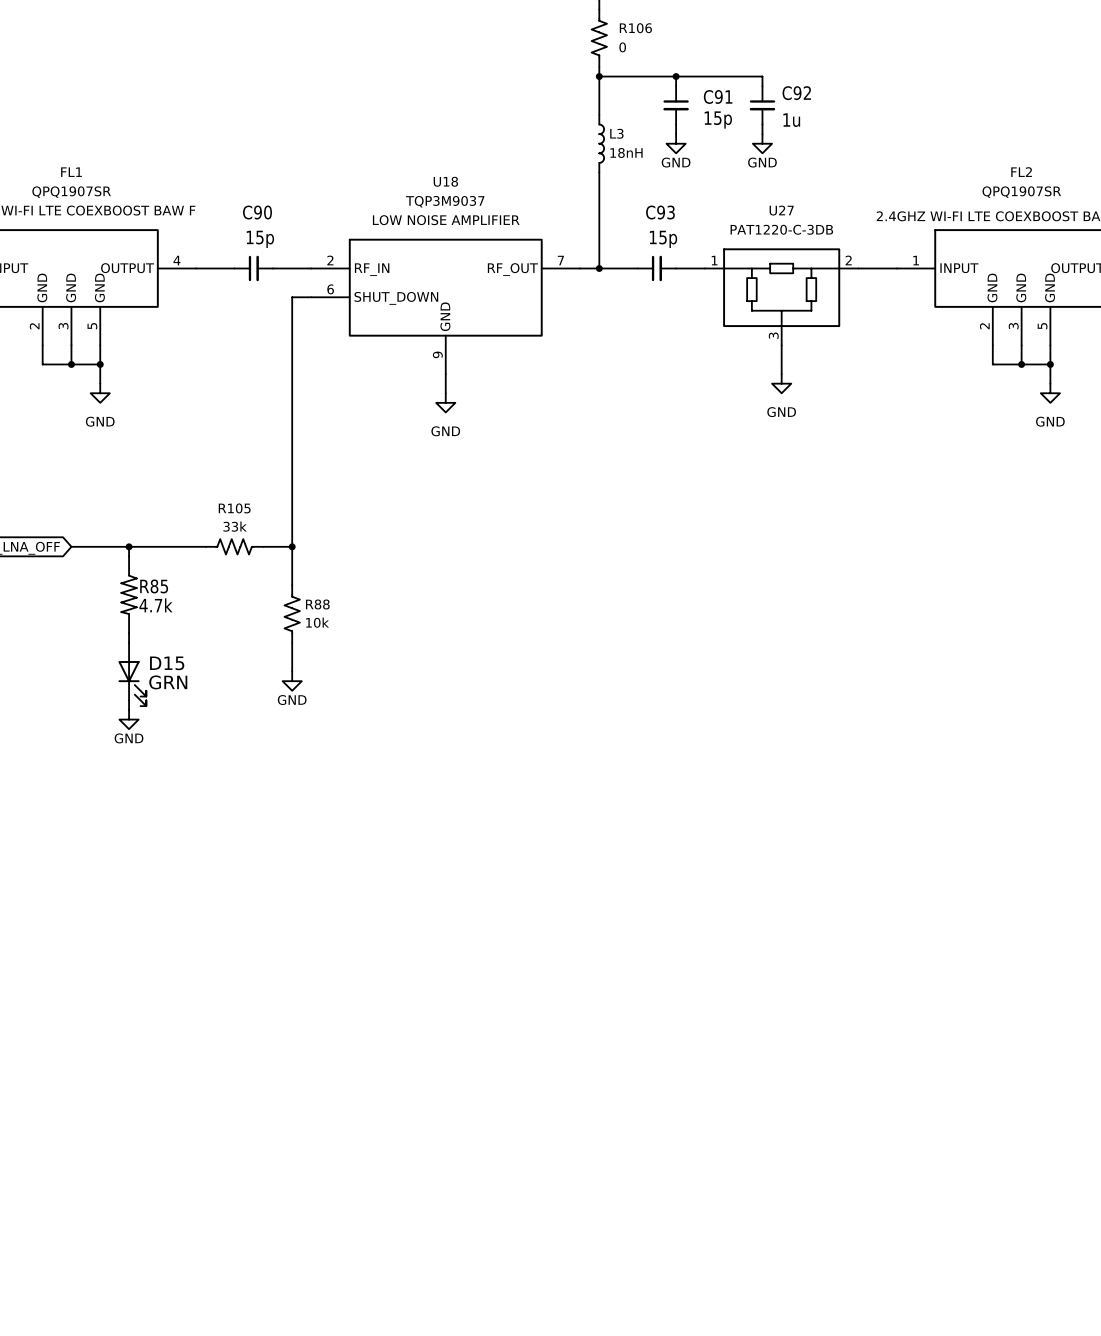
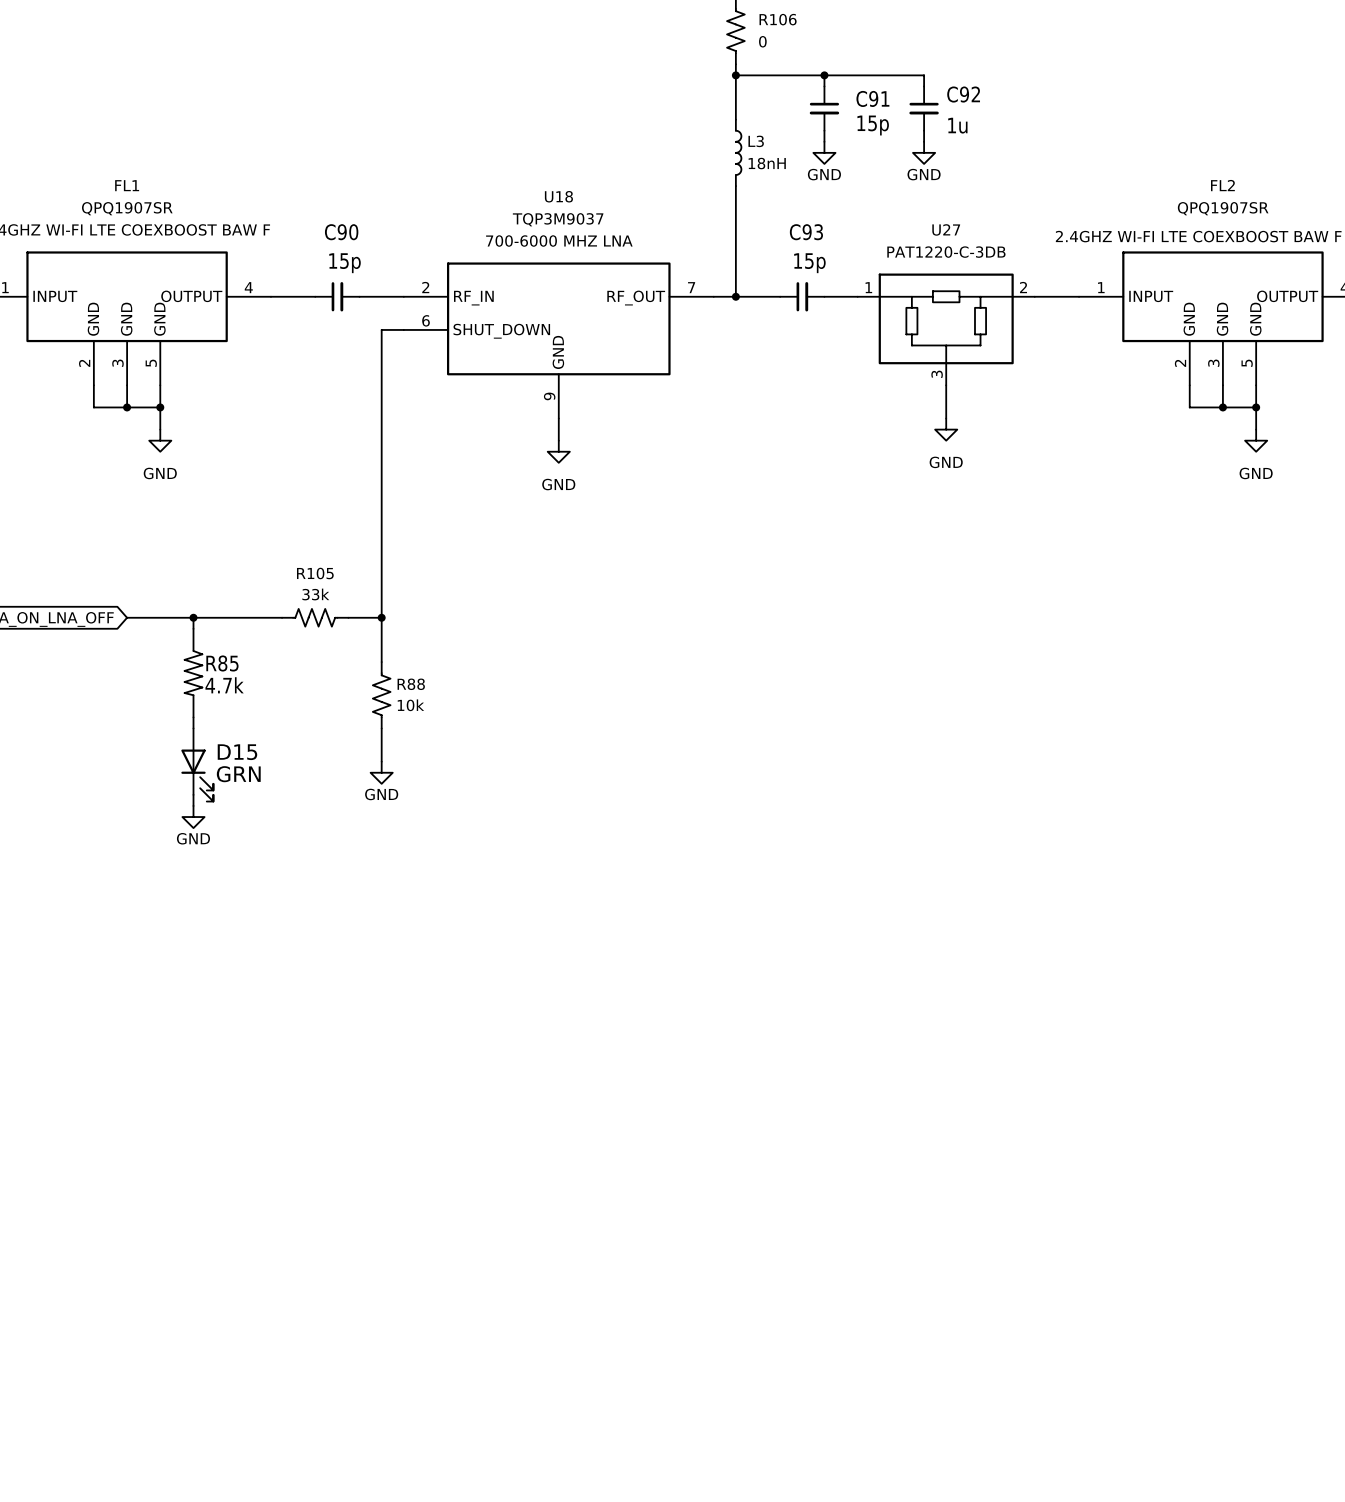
U18 text: LOW NOISE AMPLIFIER (446, 220) -> 700-6000 MHZ LNA (559, 241)

